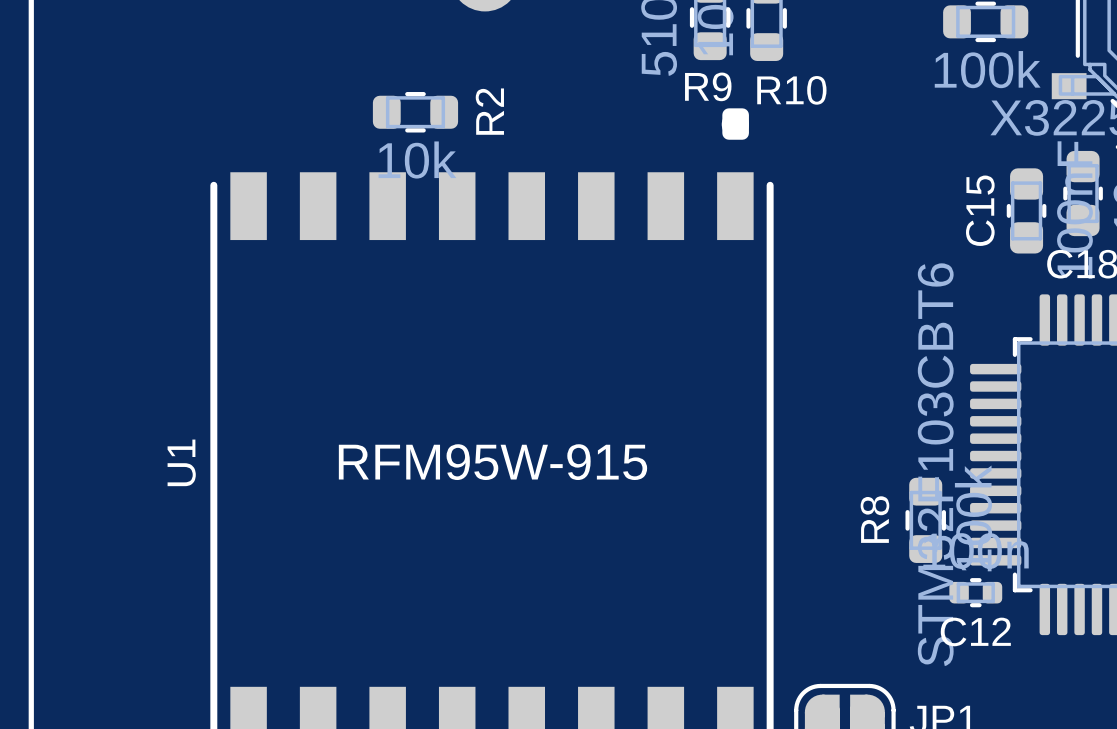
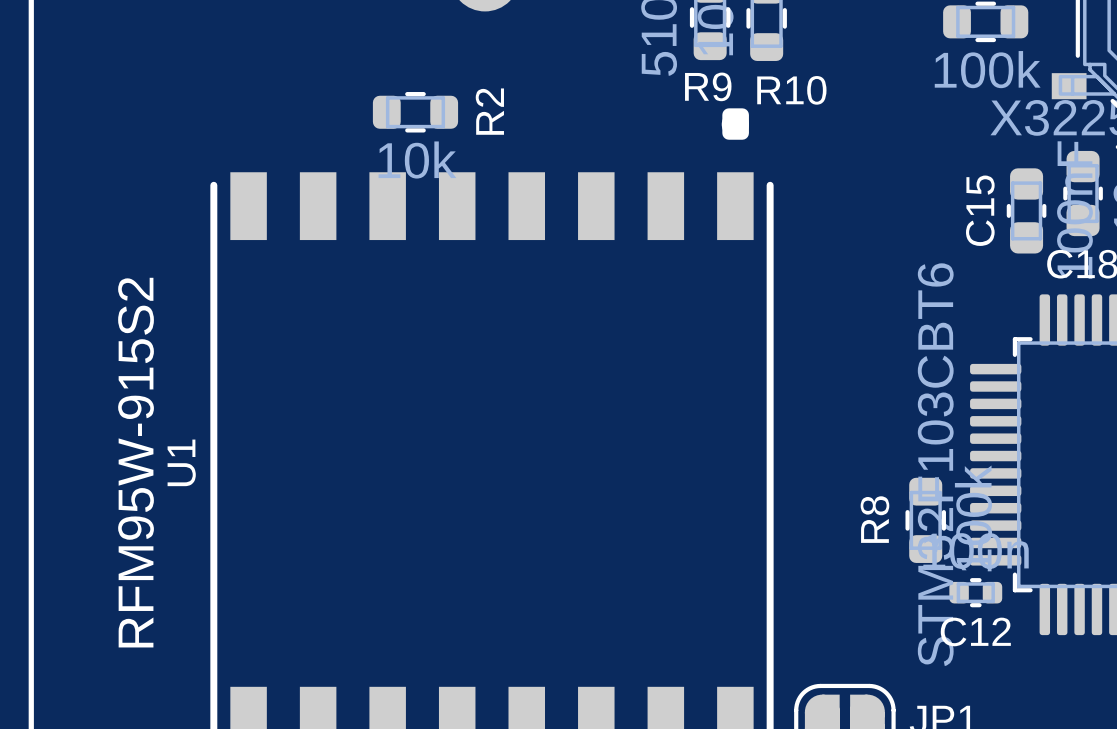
U1 value: RFM95W-915 (492, 462) -> RFM95W-915S2 (136, 462)

